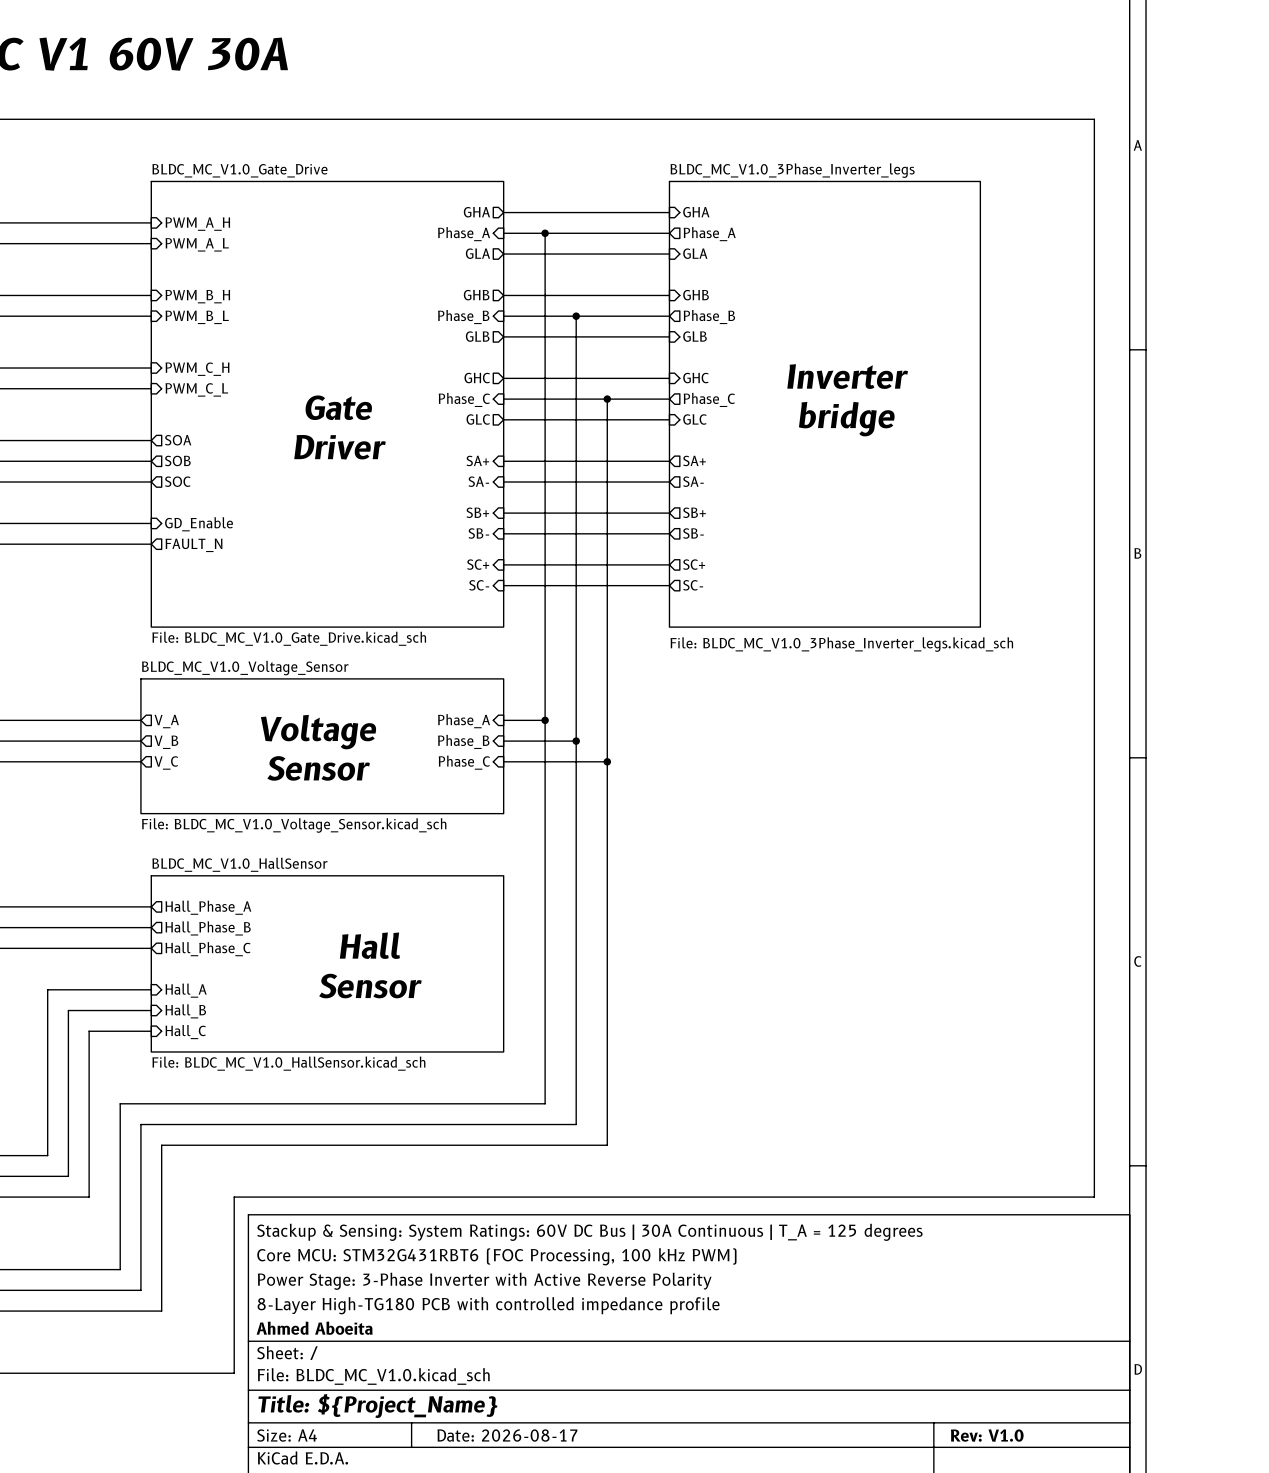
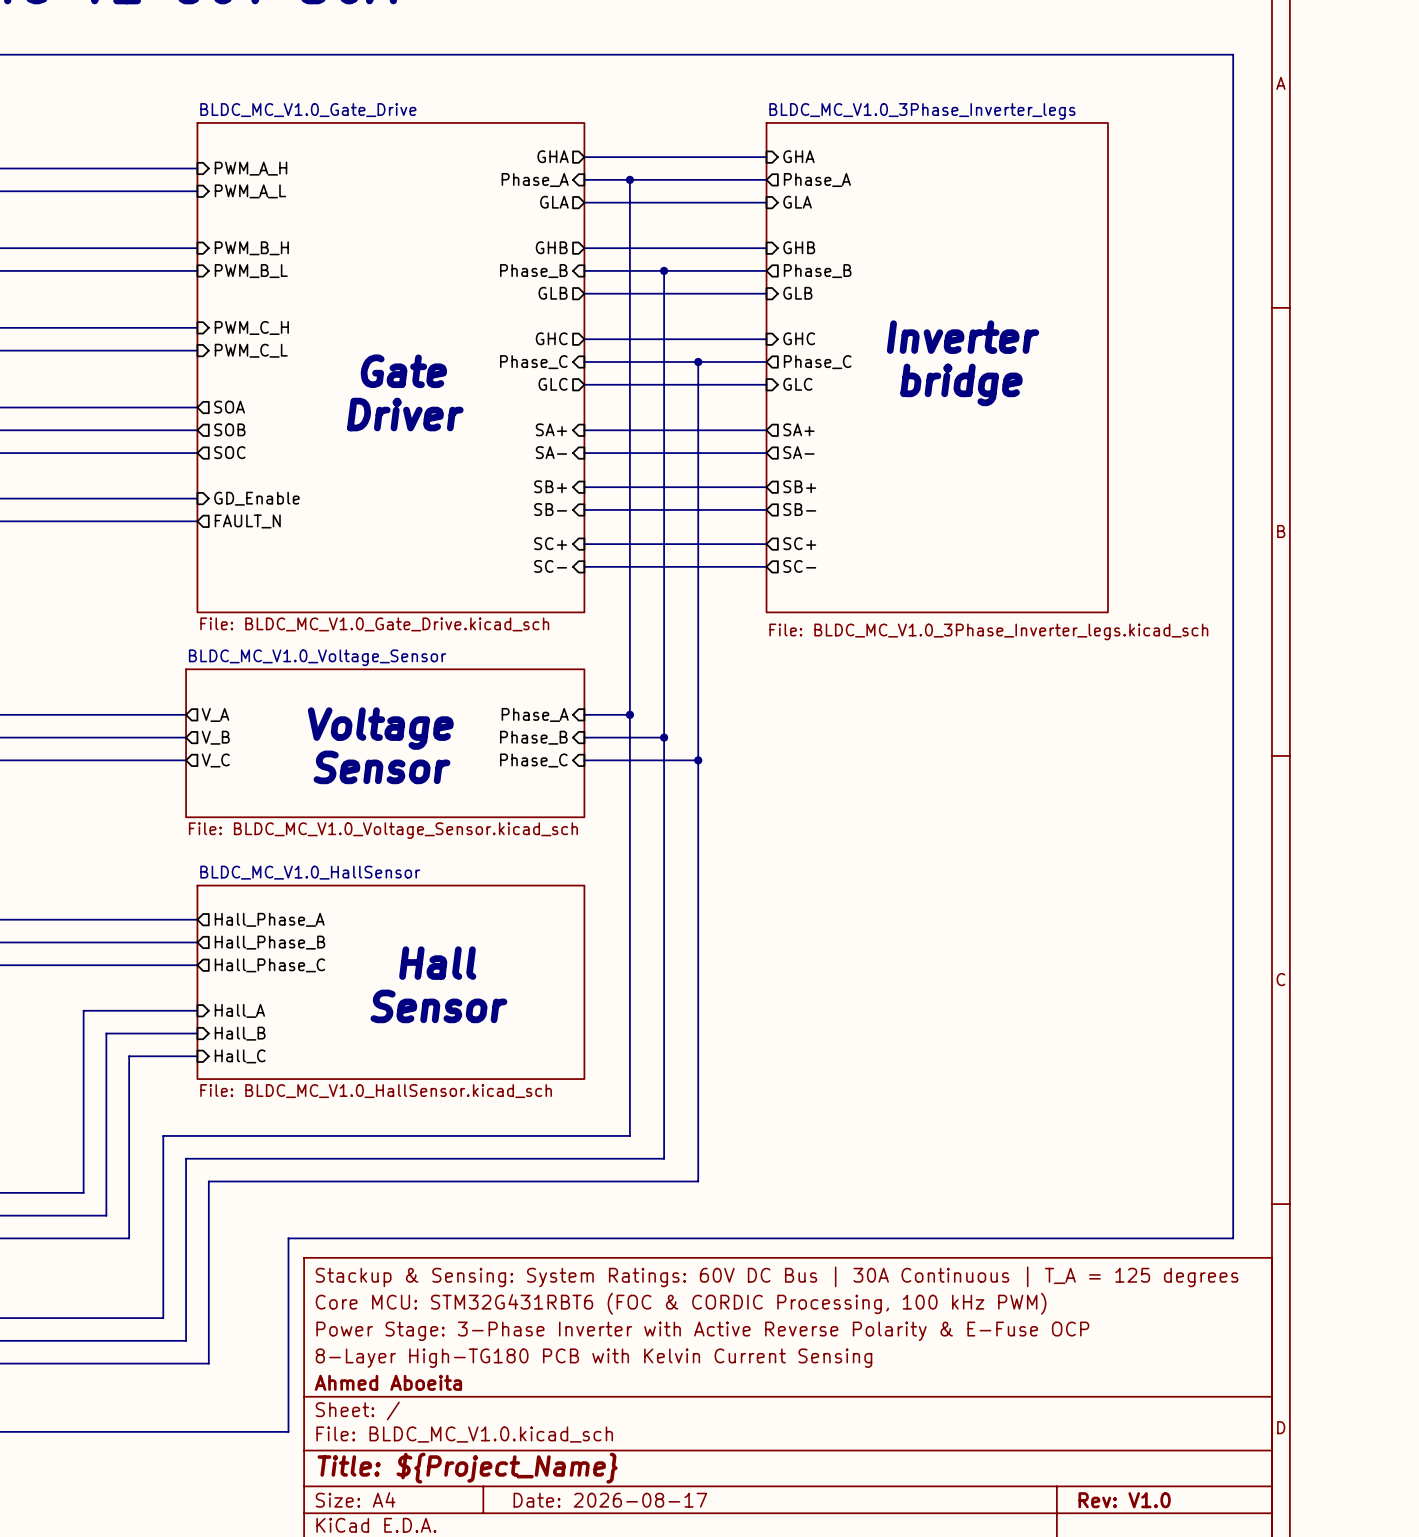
title block: Core MCU: STM32G431RBT6 (FOC Processing, 100 kHz PWM) (496, 1256) -> Core MCU: STM32G431RBT6 (FOC & CORDIC Processing, 100 kHz PWM) (681, 1303)
title block: Power Stage: 3-Phase Inverter with Active Reverse Polarity (484, 1281) -> Power Stage: 3-Phase Inverter with Active Reverse Polarity & E-Fuse OCP (702, 1331)
title block: 8-Layer High-TG180 PCB with controlled impedance profile (488, 1305) -> 8-Layer High-TG180 PCB with Kelvin Current Sensing (594, 1358)

